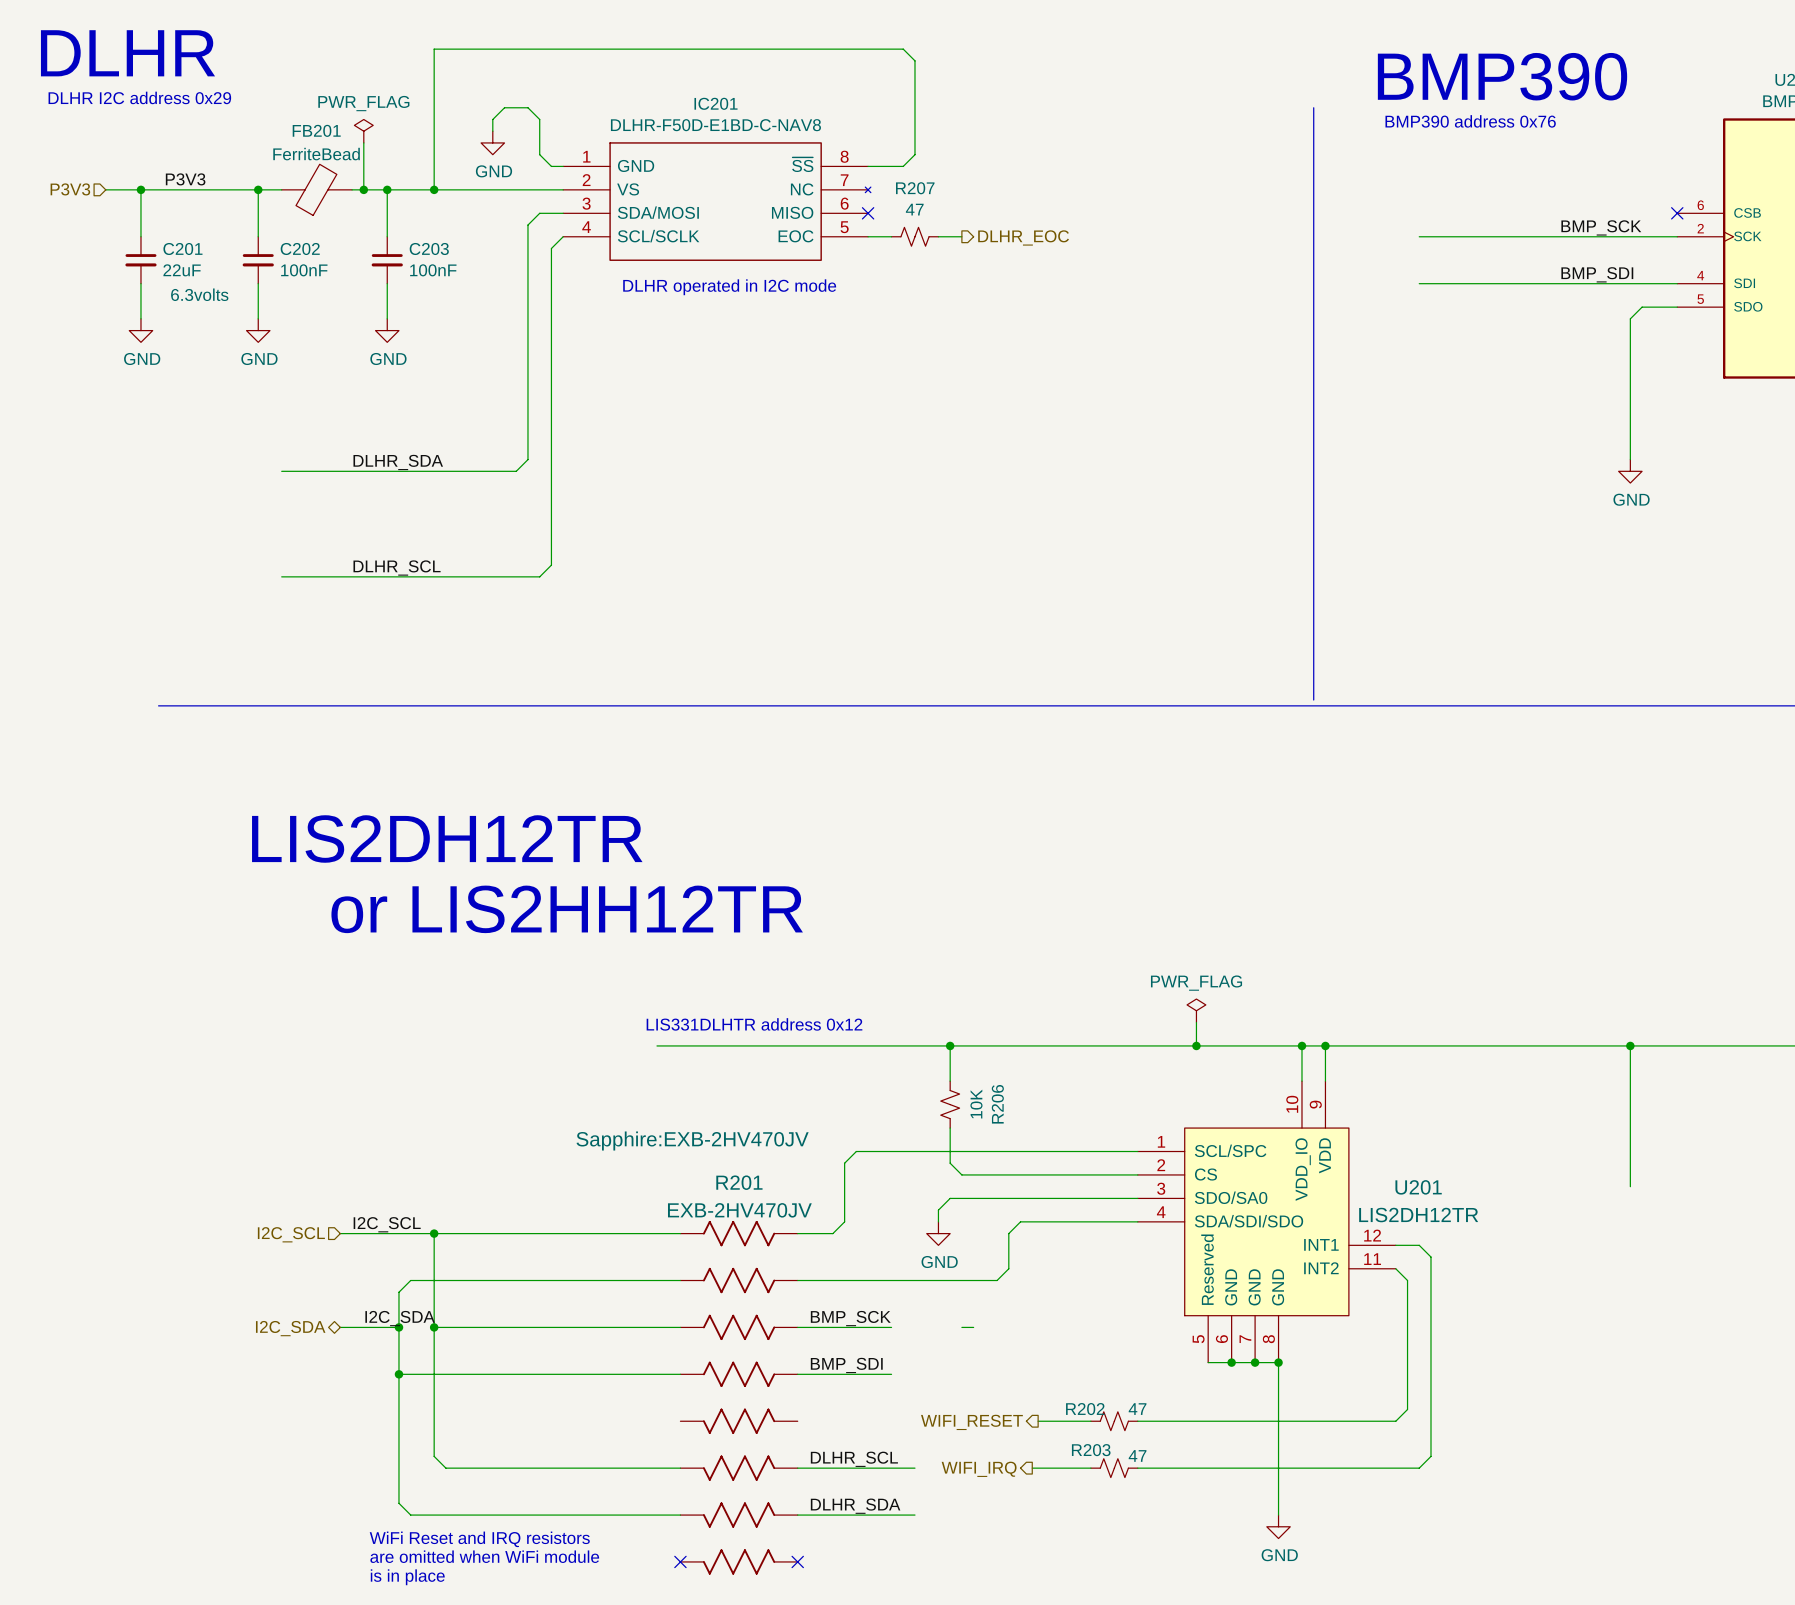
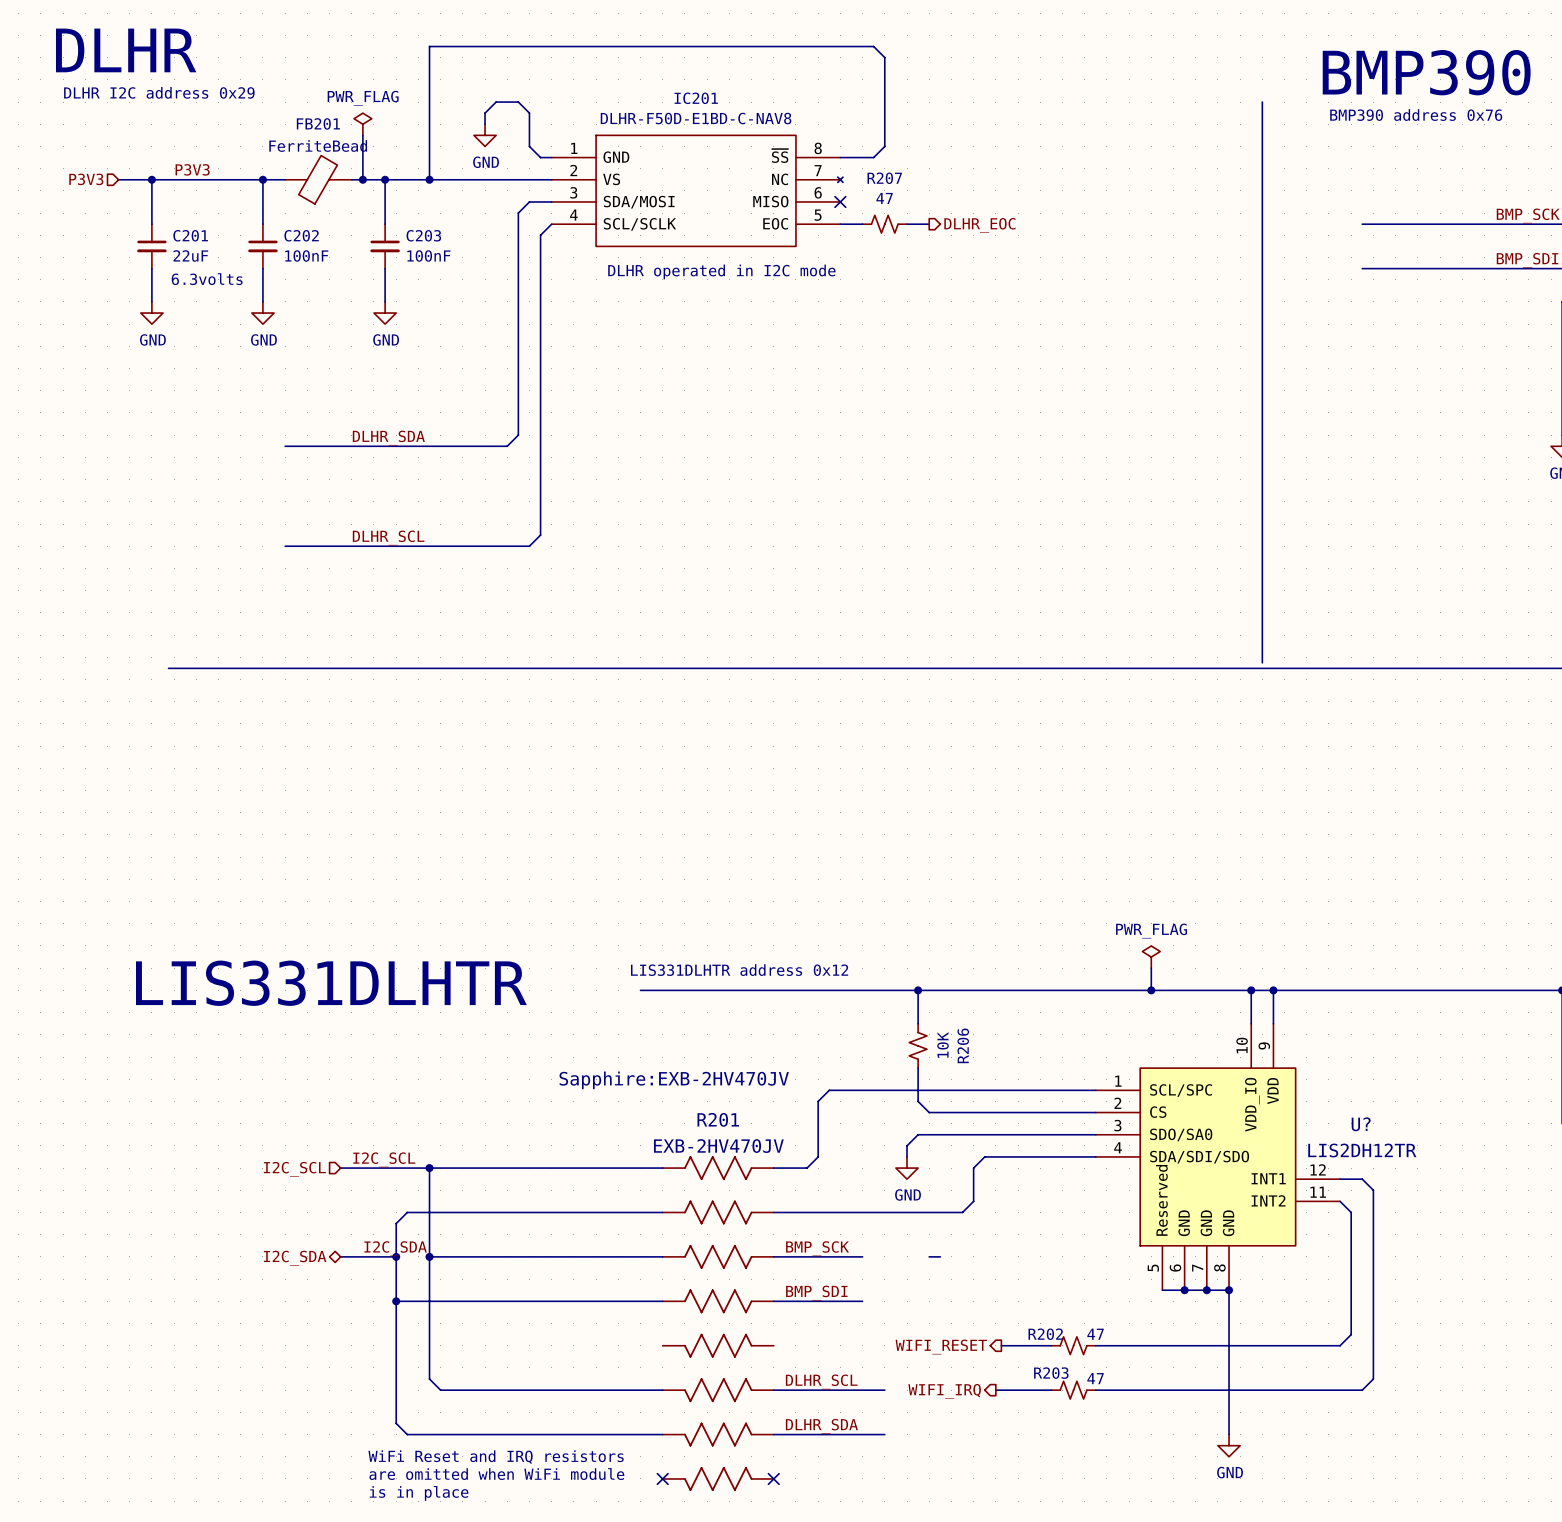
text: LIS2DH12TR (447, 838) -> none
text: or LIS2HH12TR (567, 909) -> none
text: none -> LIS331DLHTR (331, 983)
U201 name: U201 (1418, 1187) -> U? (1361, 1124)

